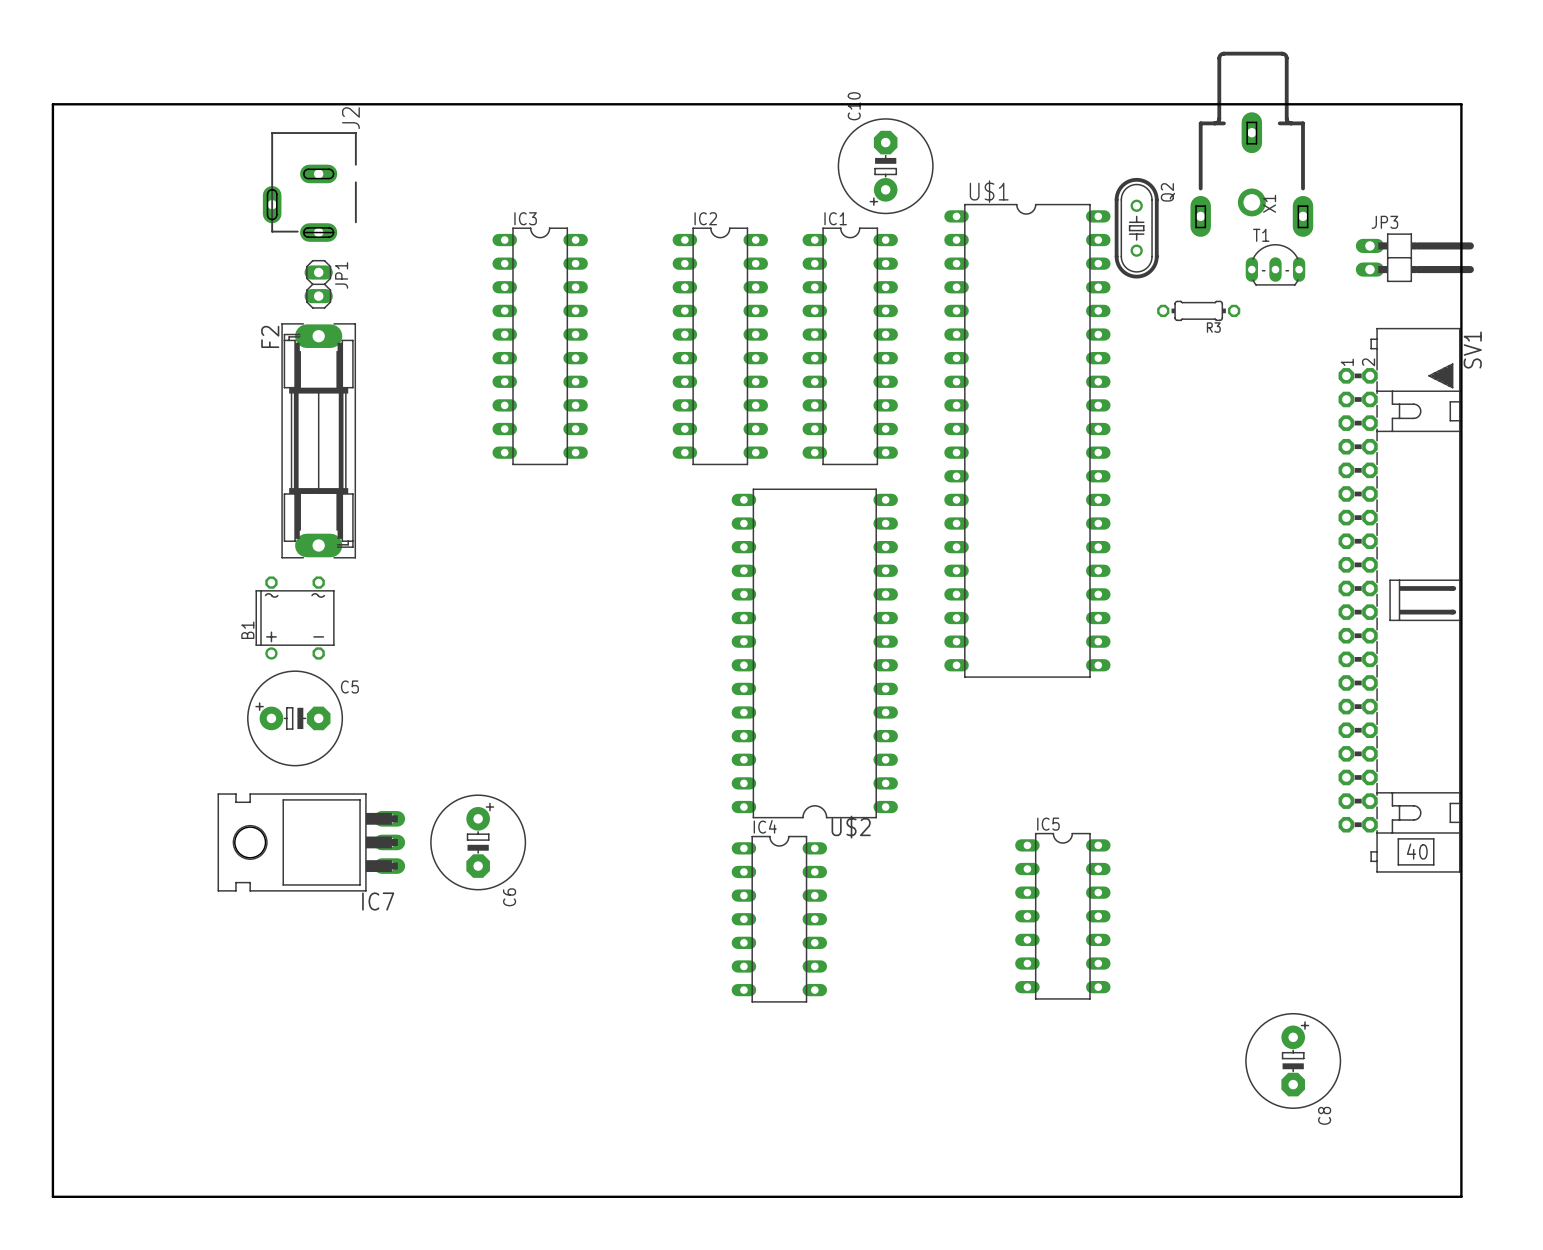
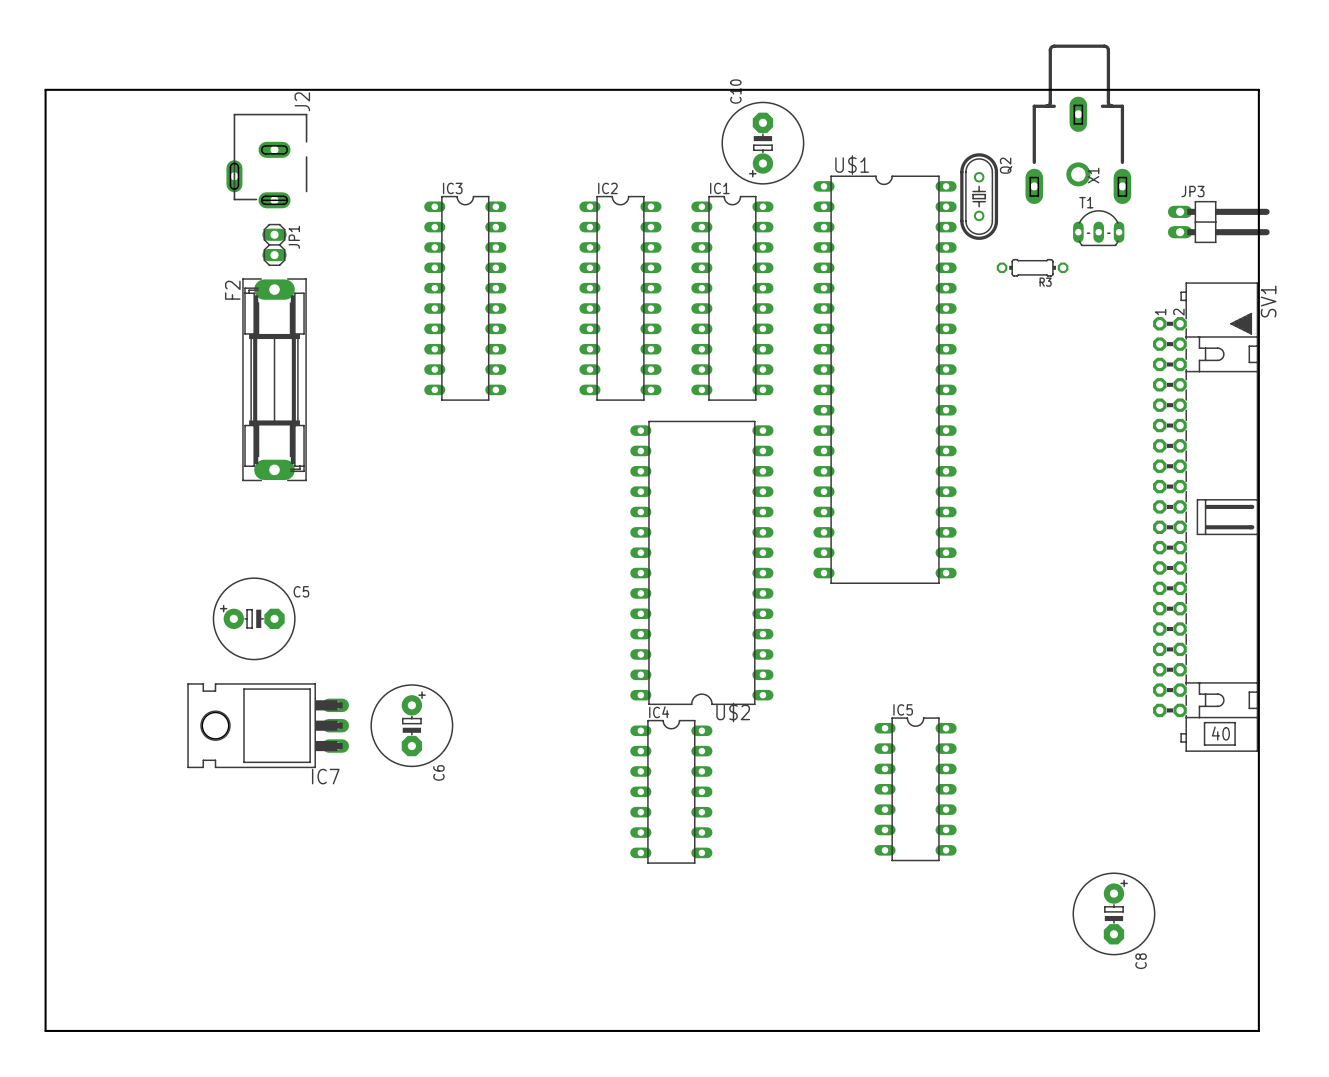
B1: (295, 618) -> none

